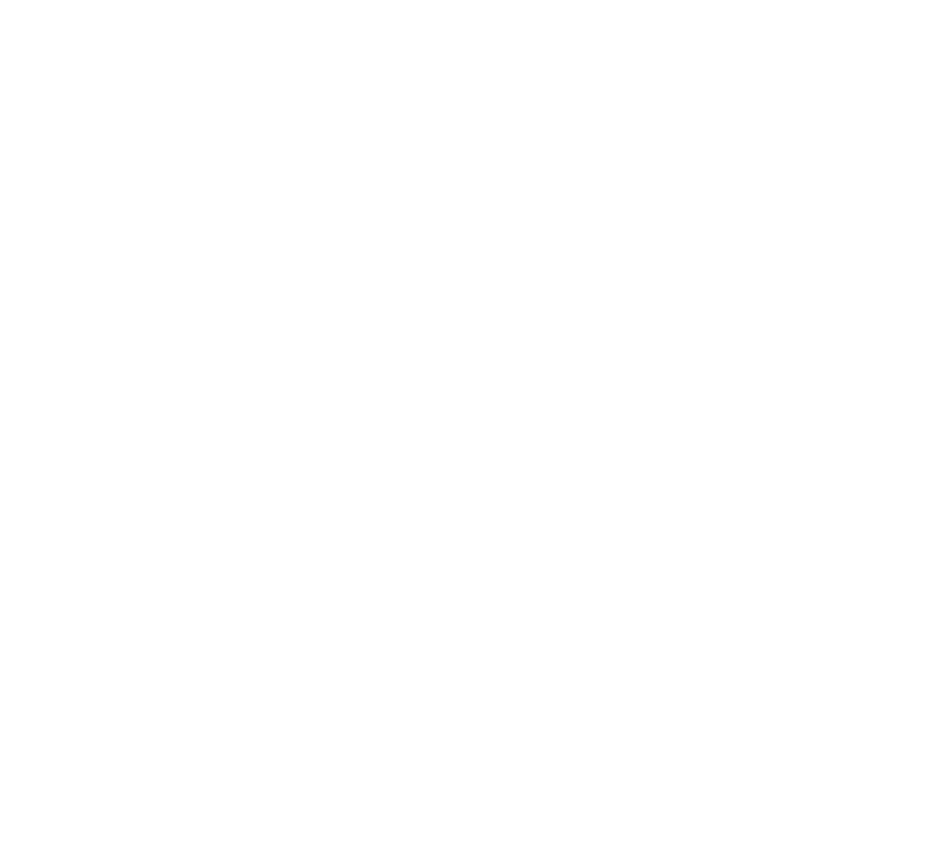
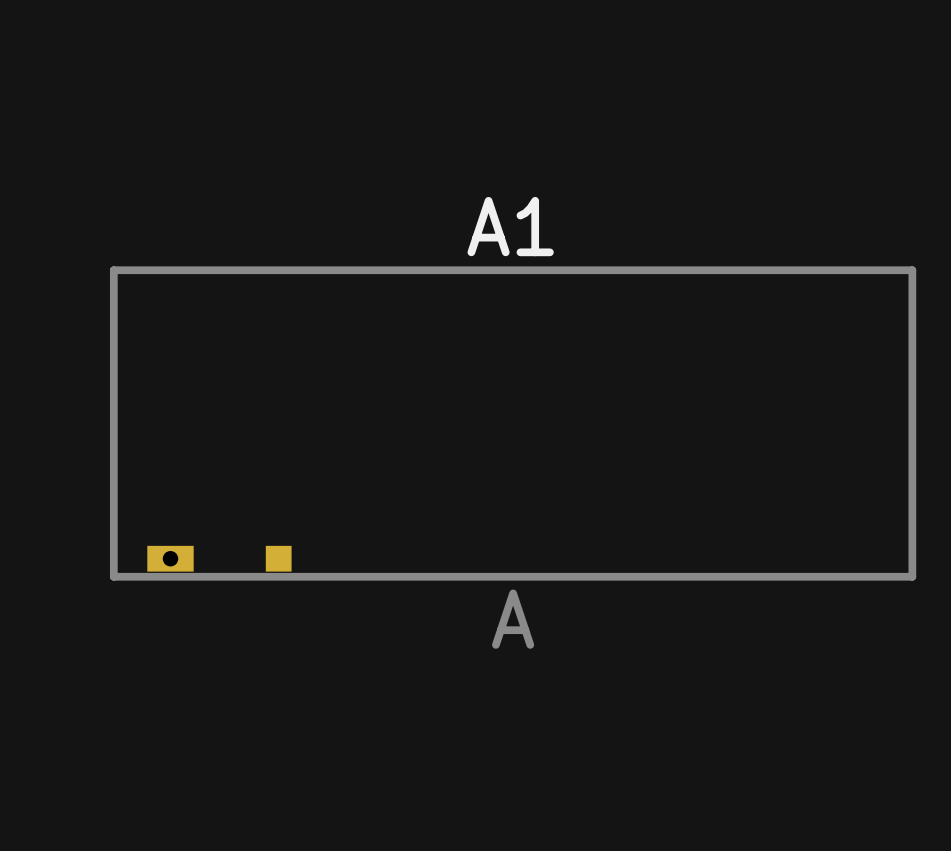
A1: none -> A (513, 423)

